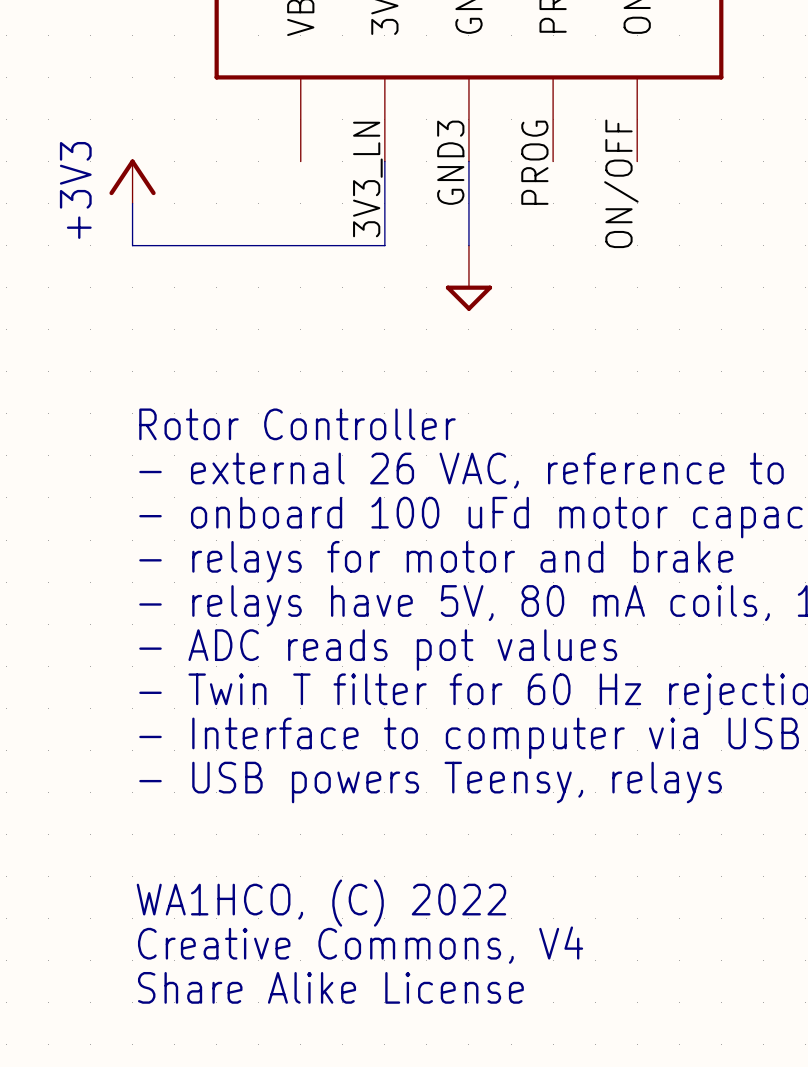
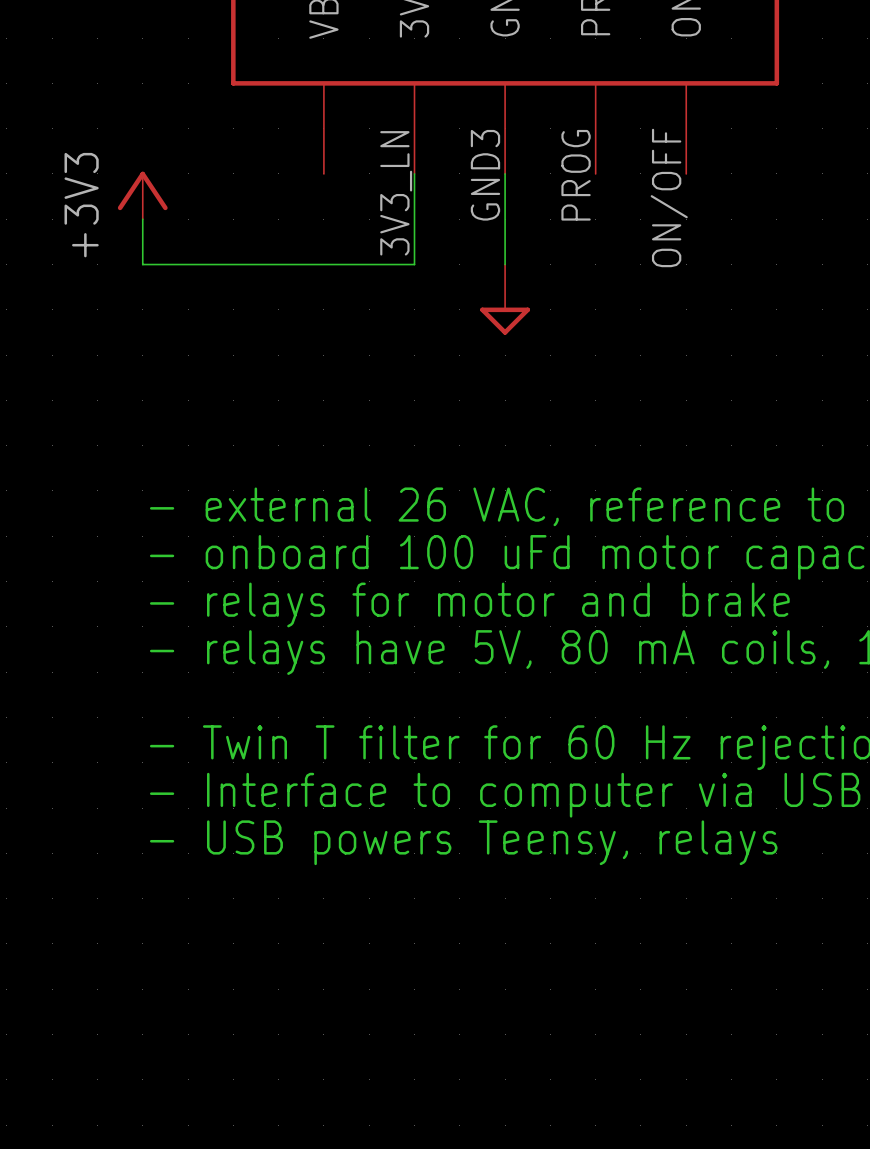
text: Rotor Controller (297, 424) -> none
text: - ADC reads pot values (378, 650) -> none
text: WA1HCO, (C) 2022 (321, 903) -> none
text: Creative Commons, V4 (360, 945) -> none
text: Share Alike License (330, 987) -> none

